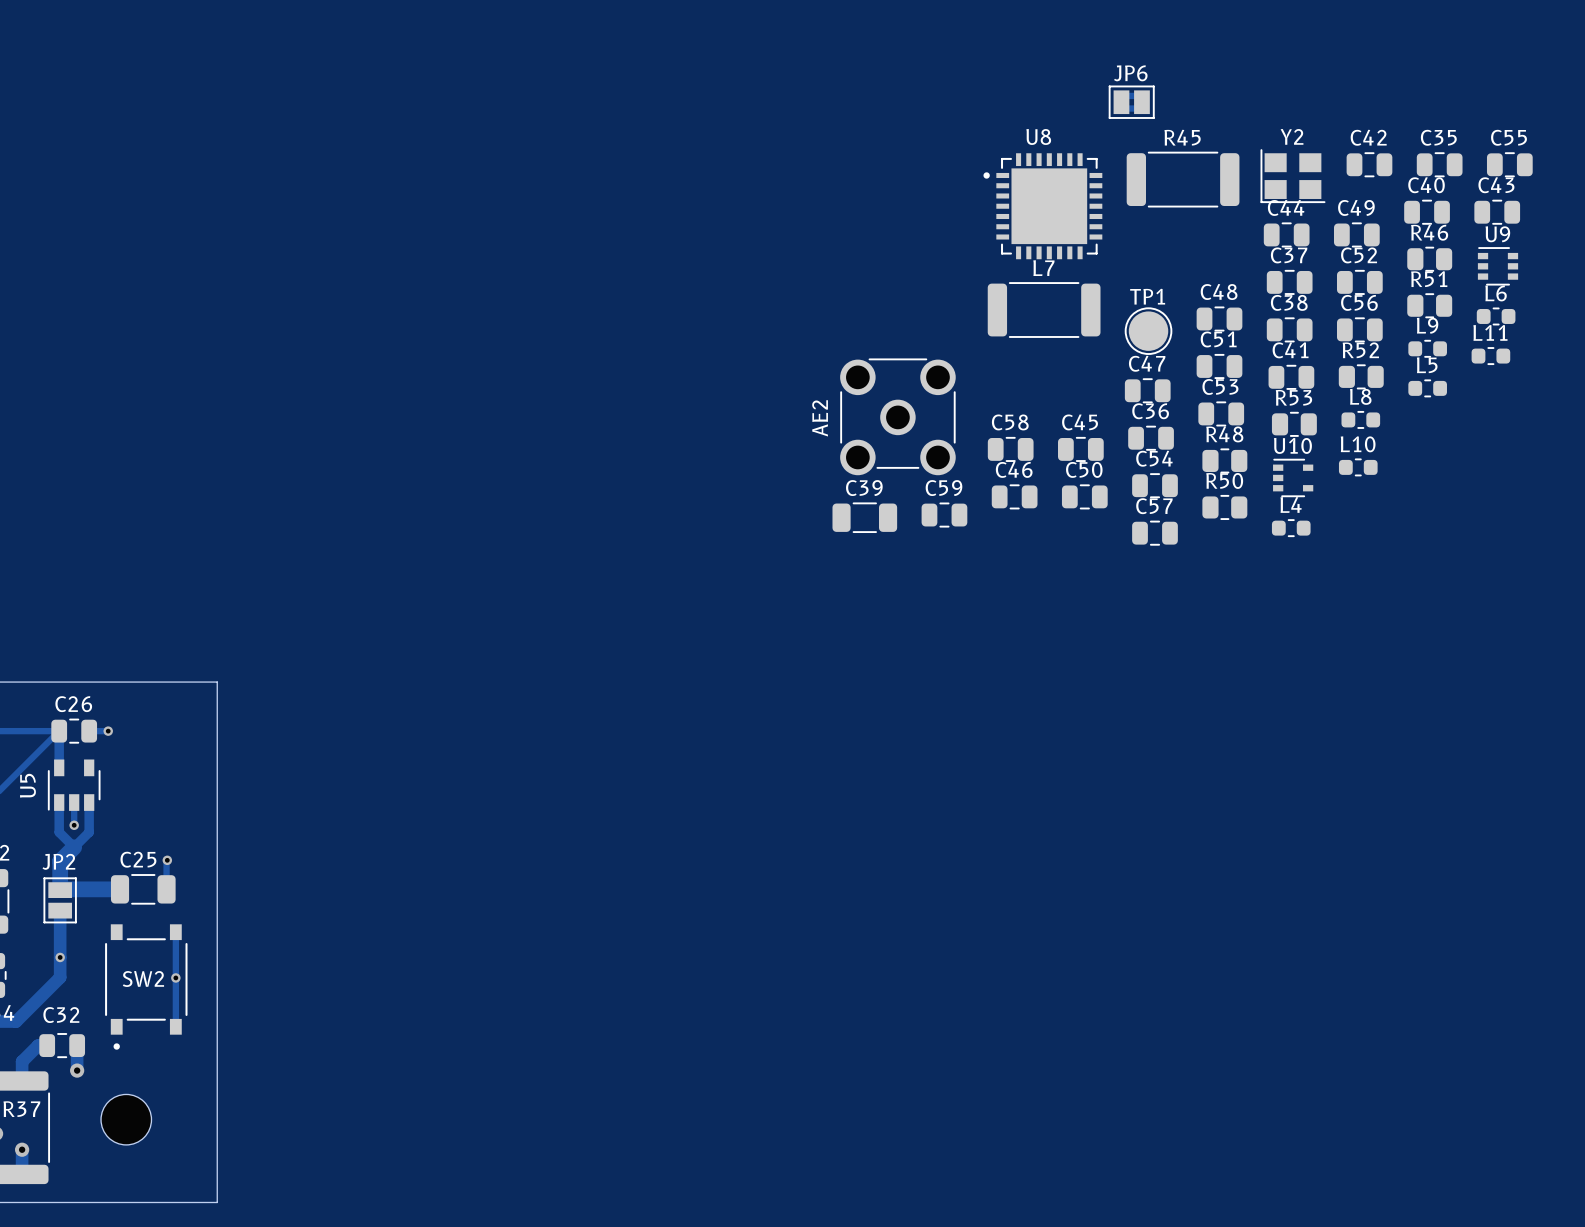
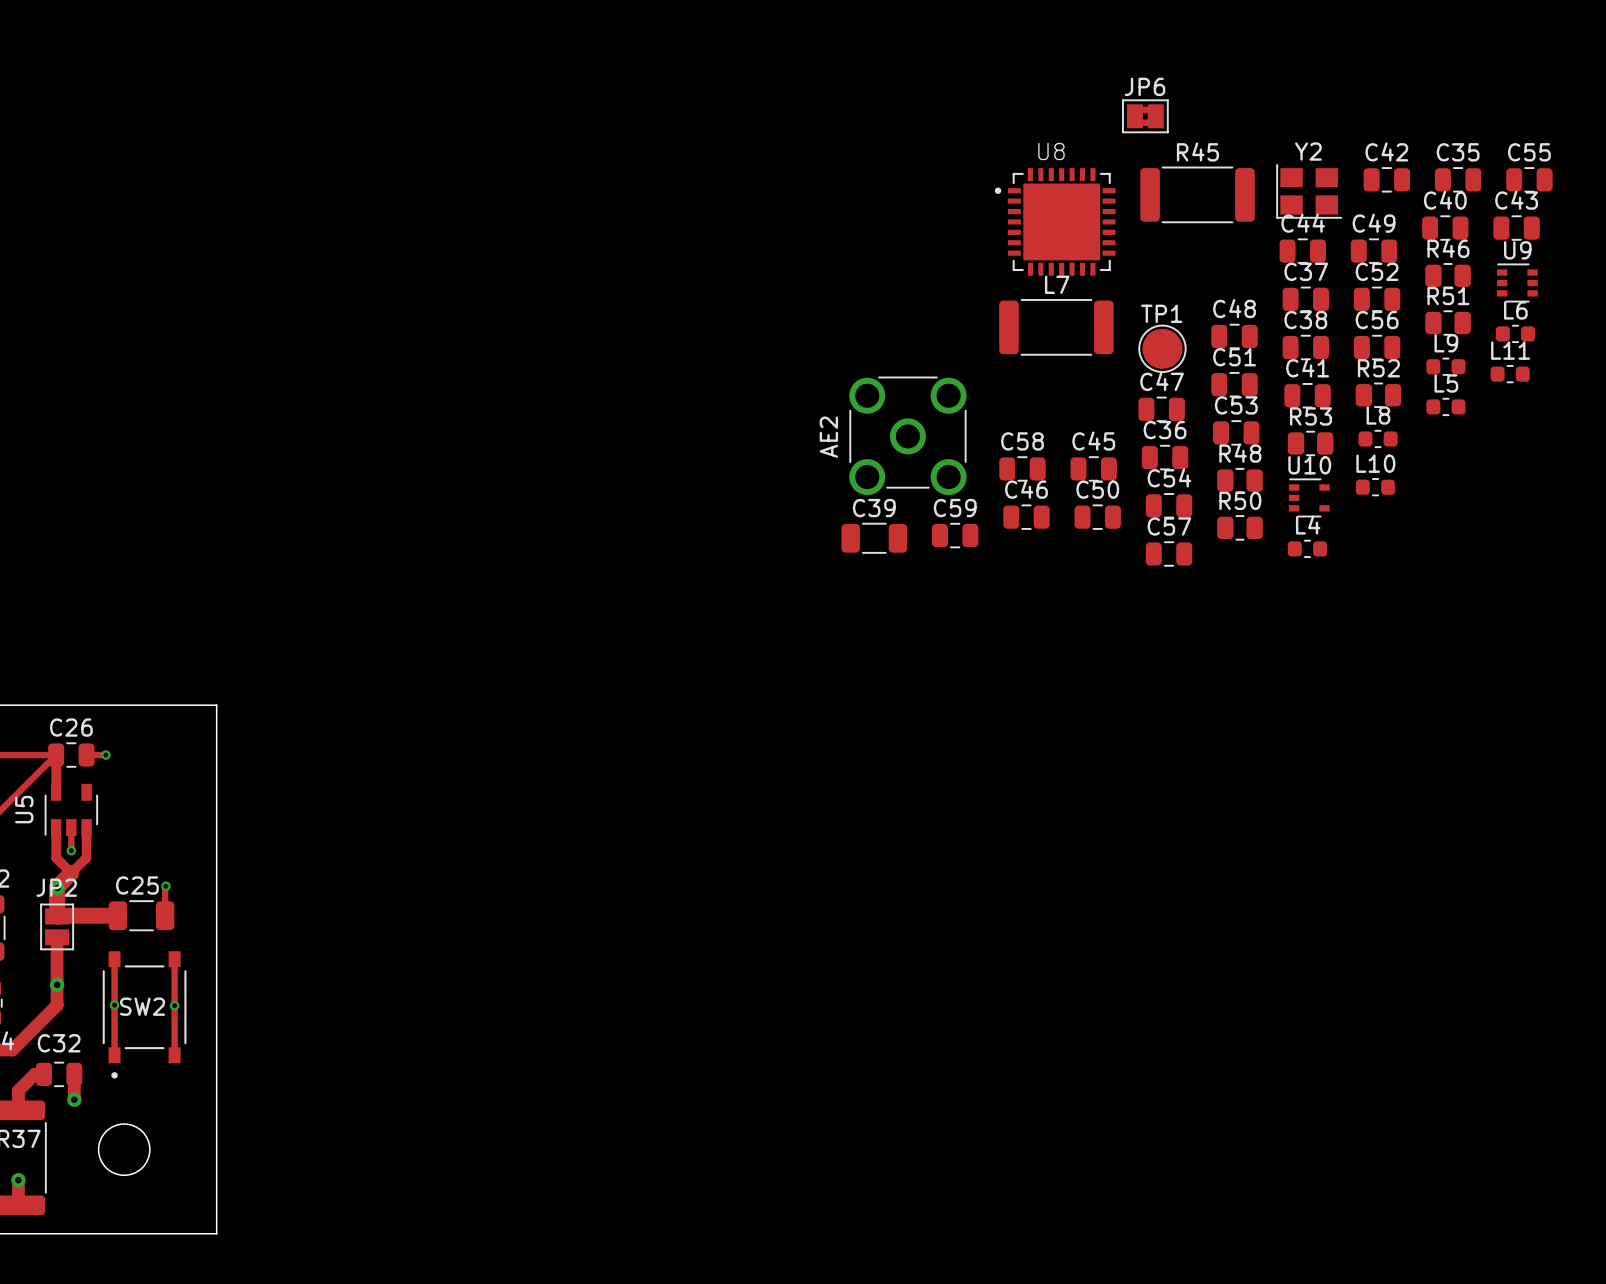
via: none -> (57, 888)
track: none -> (114, 959) (114, 1055)
via position: (60, 957) -> (114, 1005)
via: none -> (57, 984)

